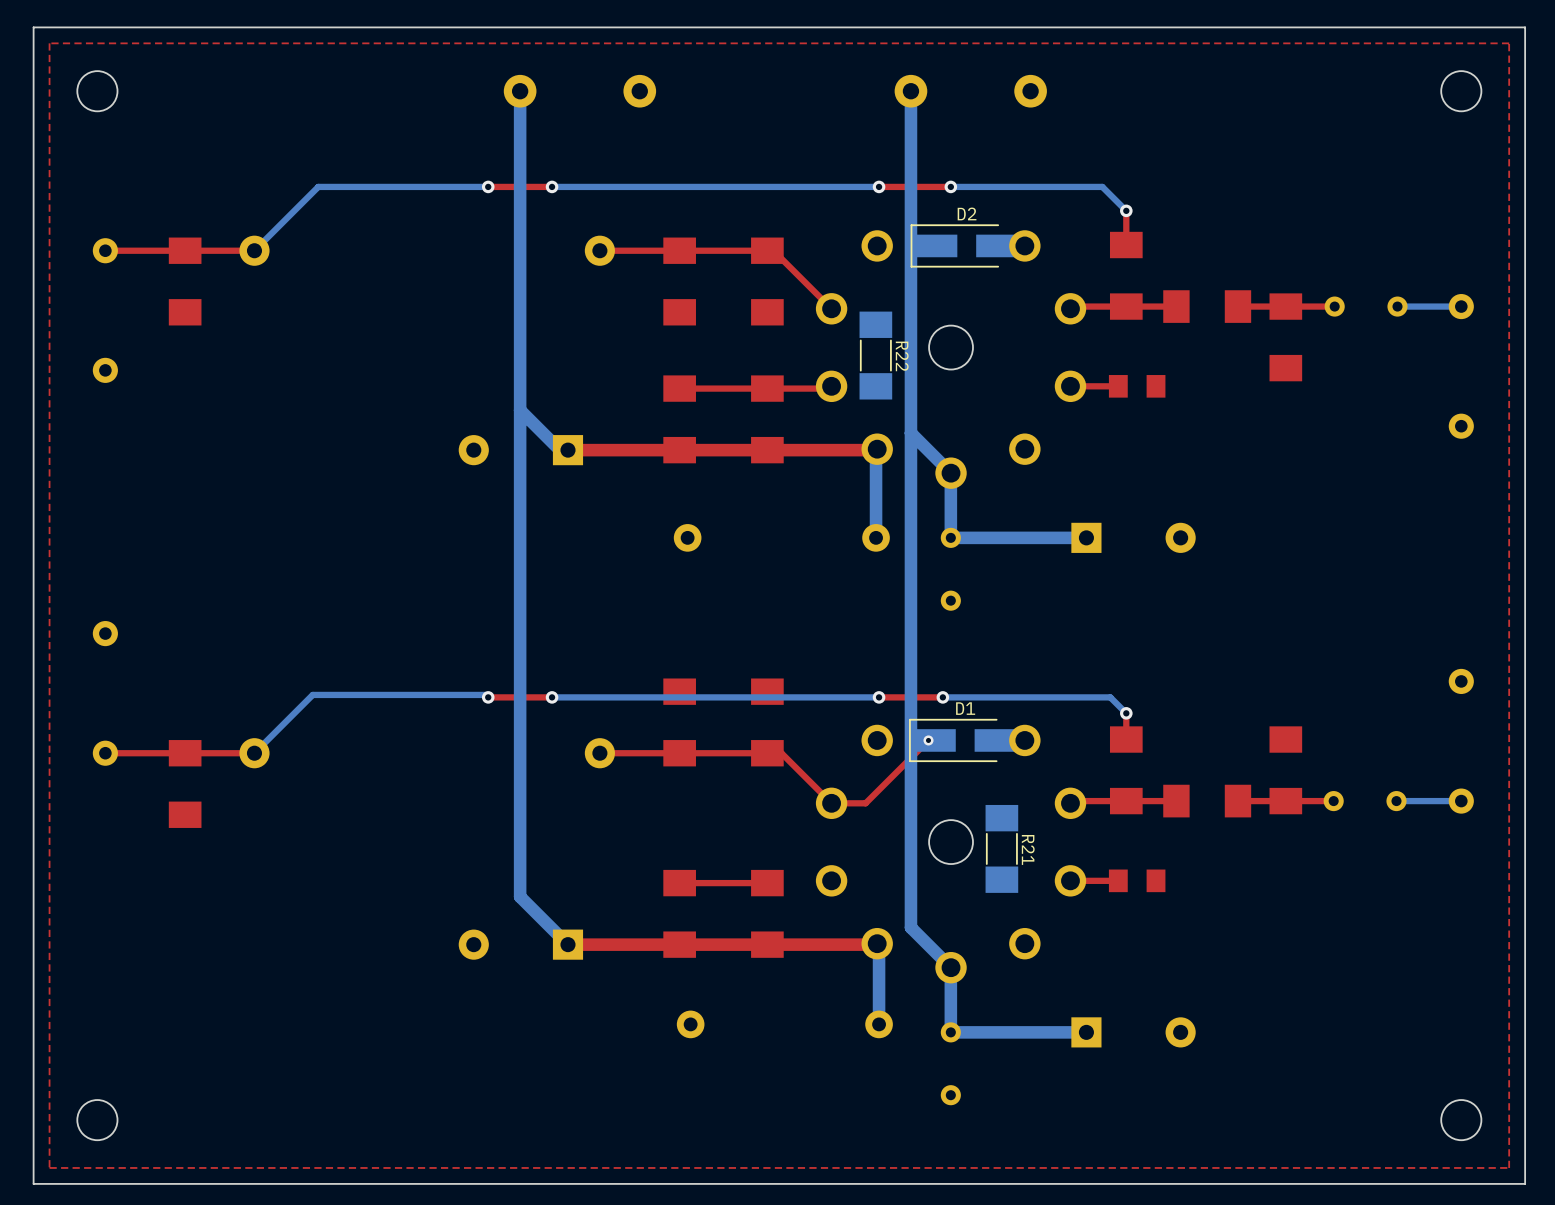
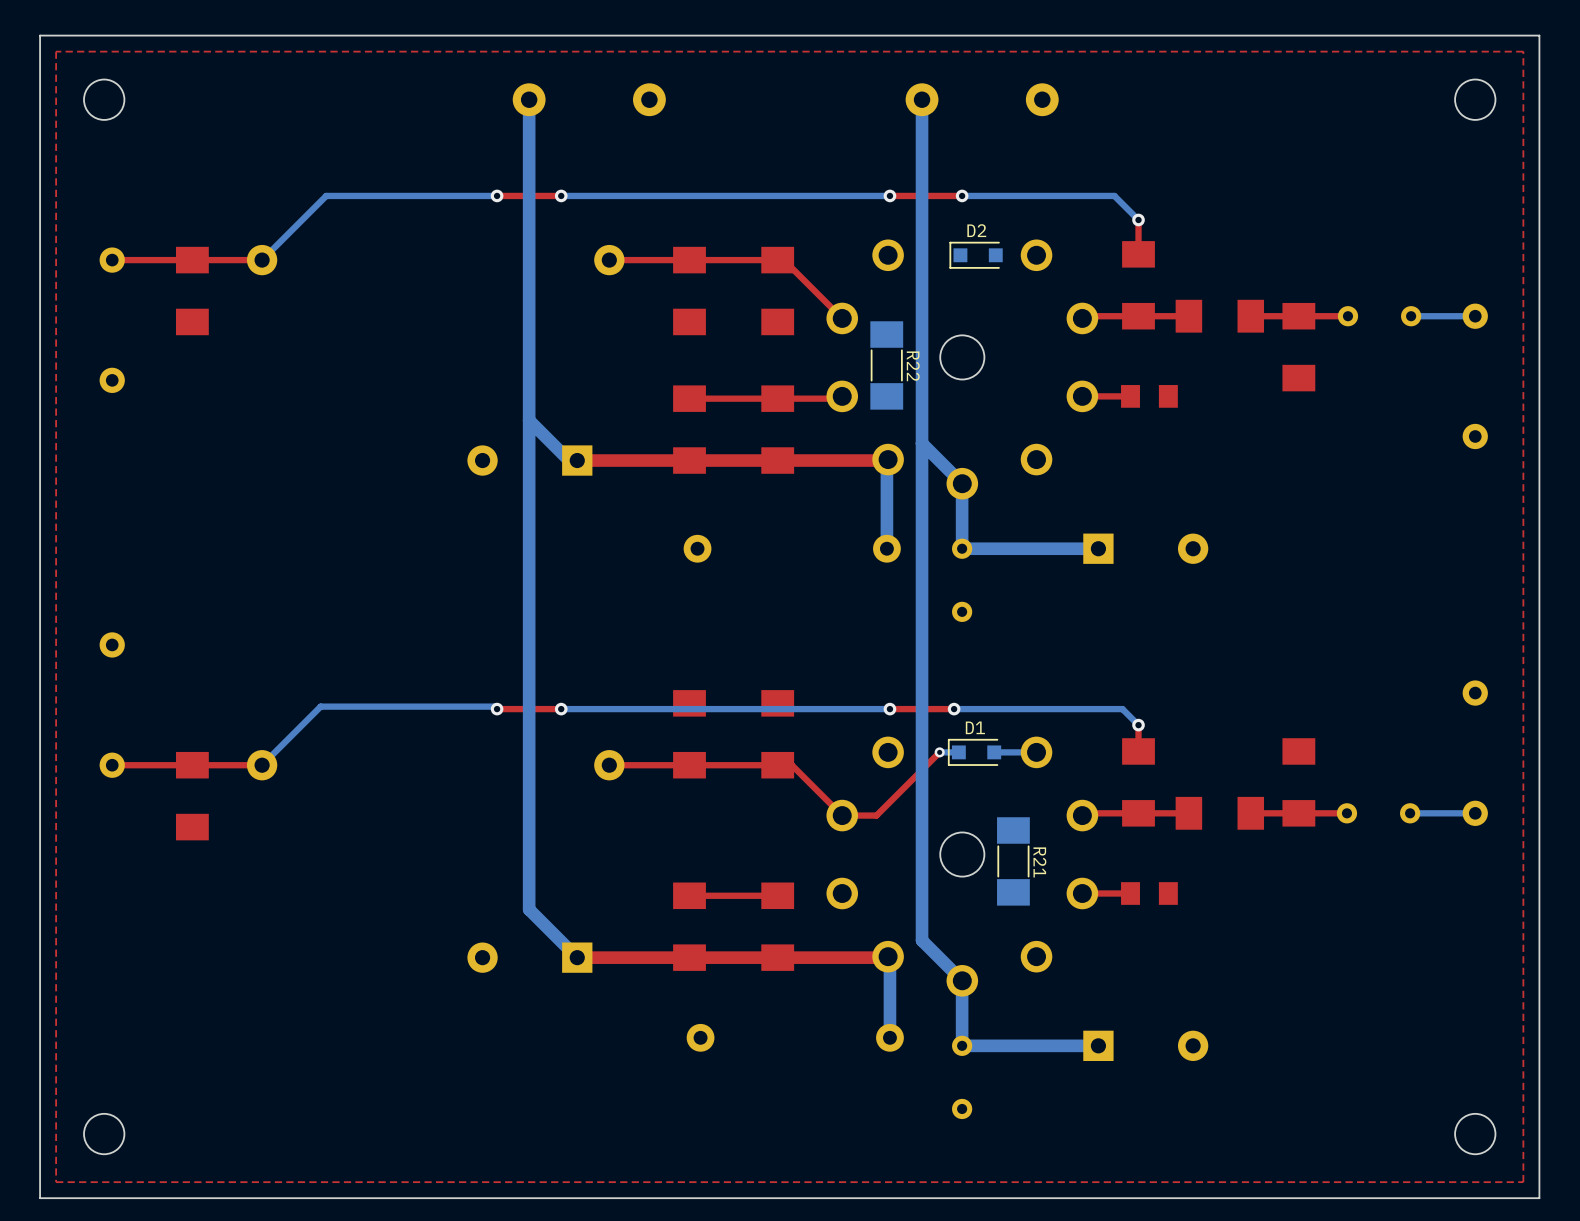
D2 footprint: [910, 224, 1021, 268] -> [949, 241, 1003, 269]
D1 footprint: [909, 718, 1019, 762] -> [948, 739, 1002, 766]

